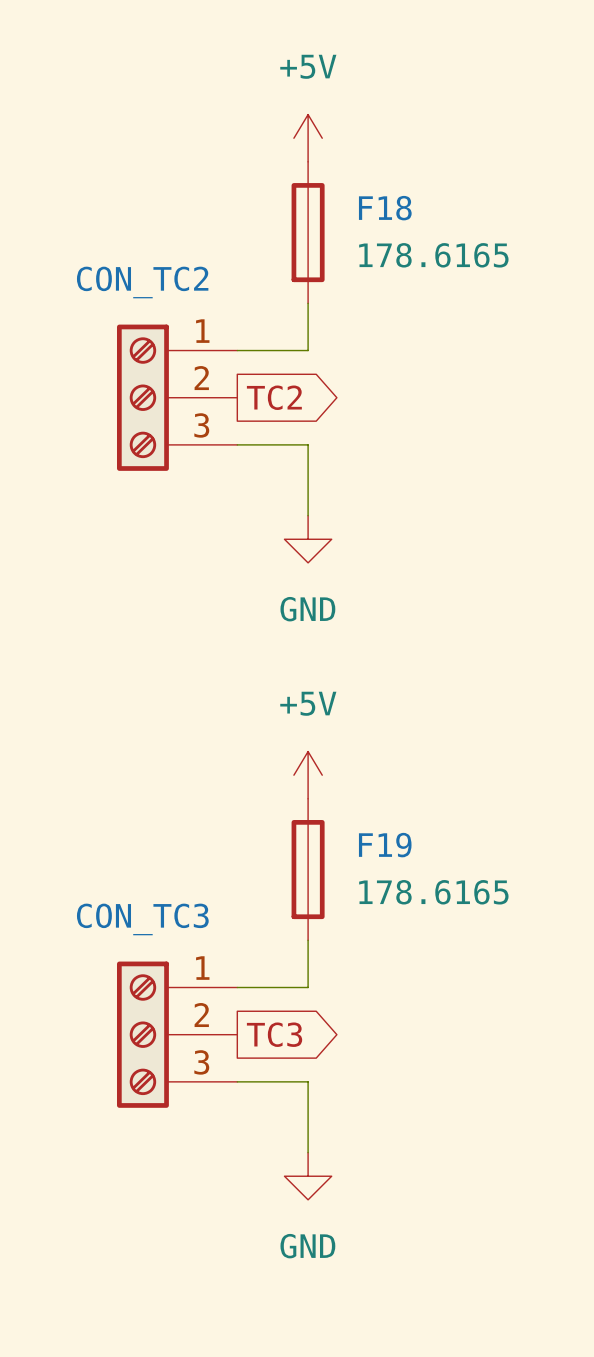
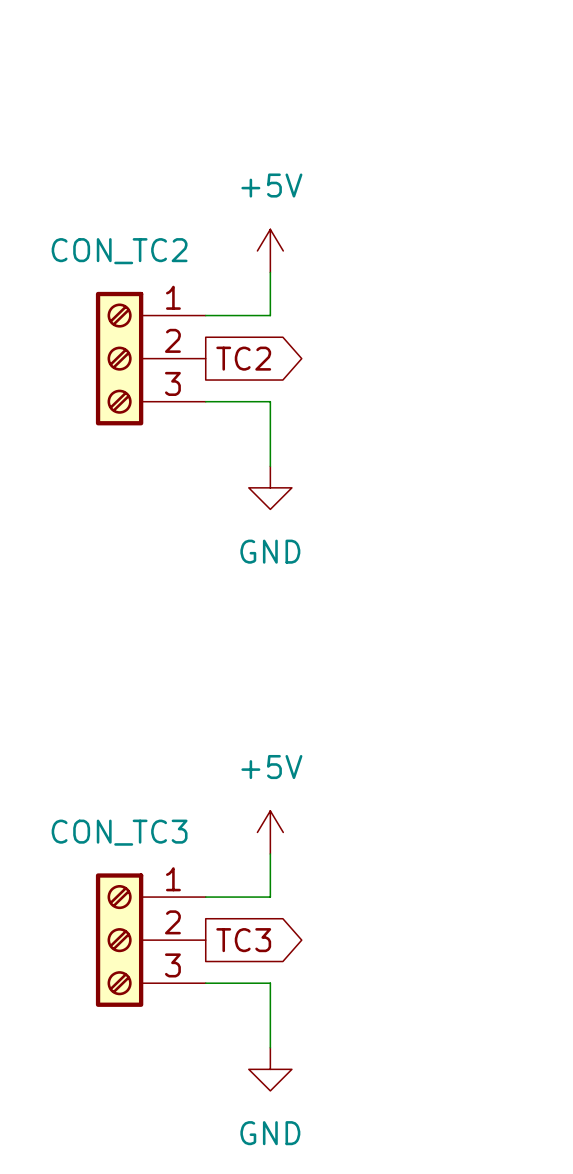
power symbol position: +5V (308, 138) -> +5V (270, 250)
F18: 178.6165 (308, 232) -> none
power symbol position: +5V (308, 775) -> +5V (270, 832)
F19: 178.6165 (308, 869) -> none

